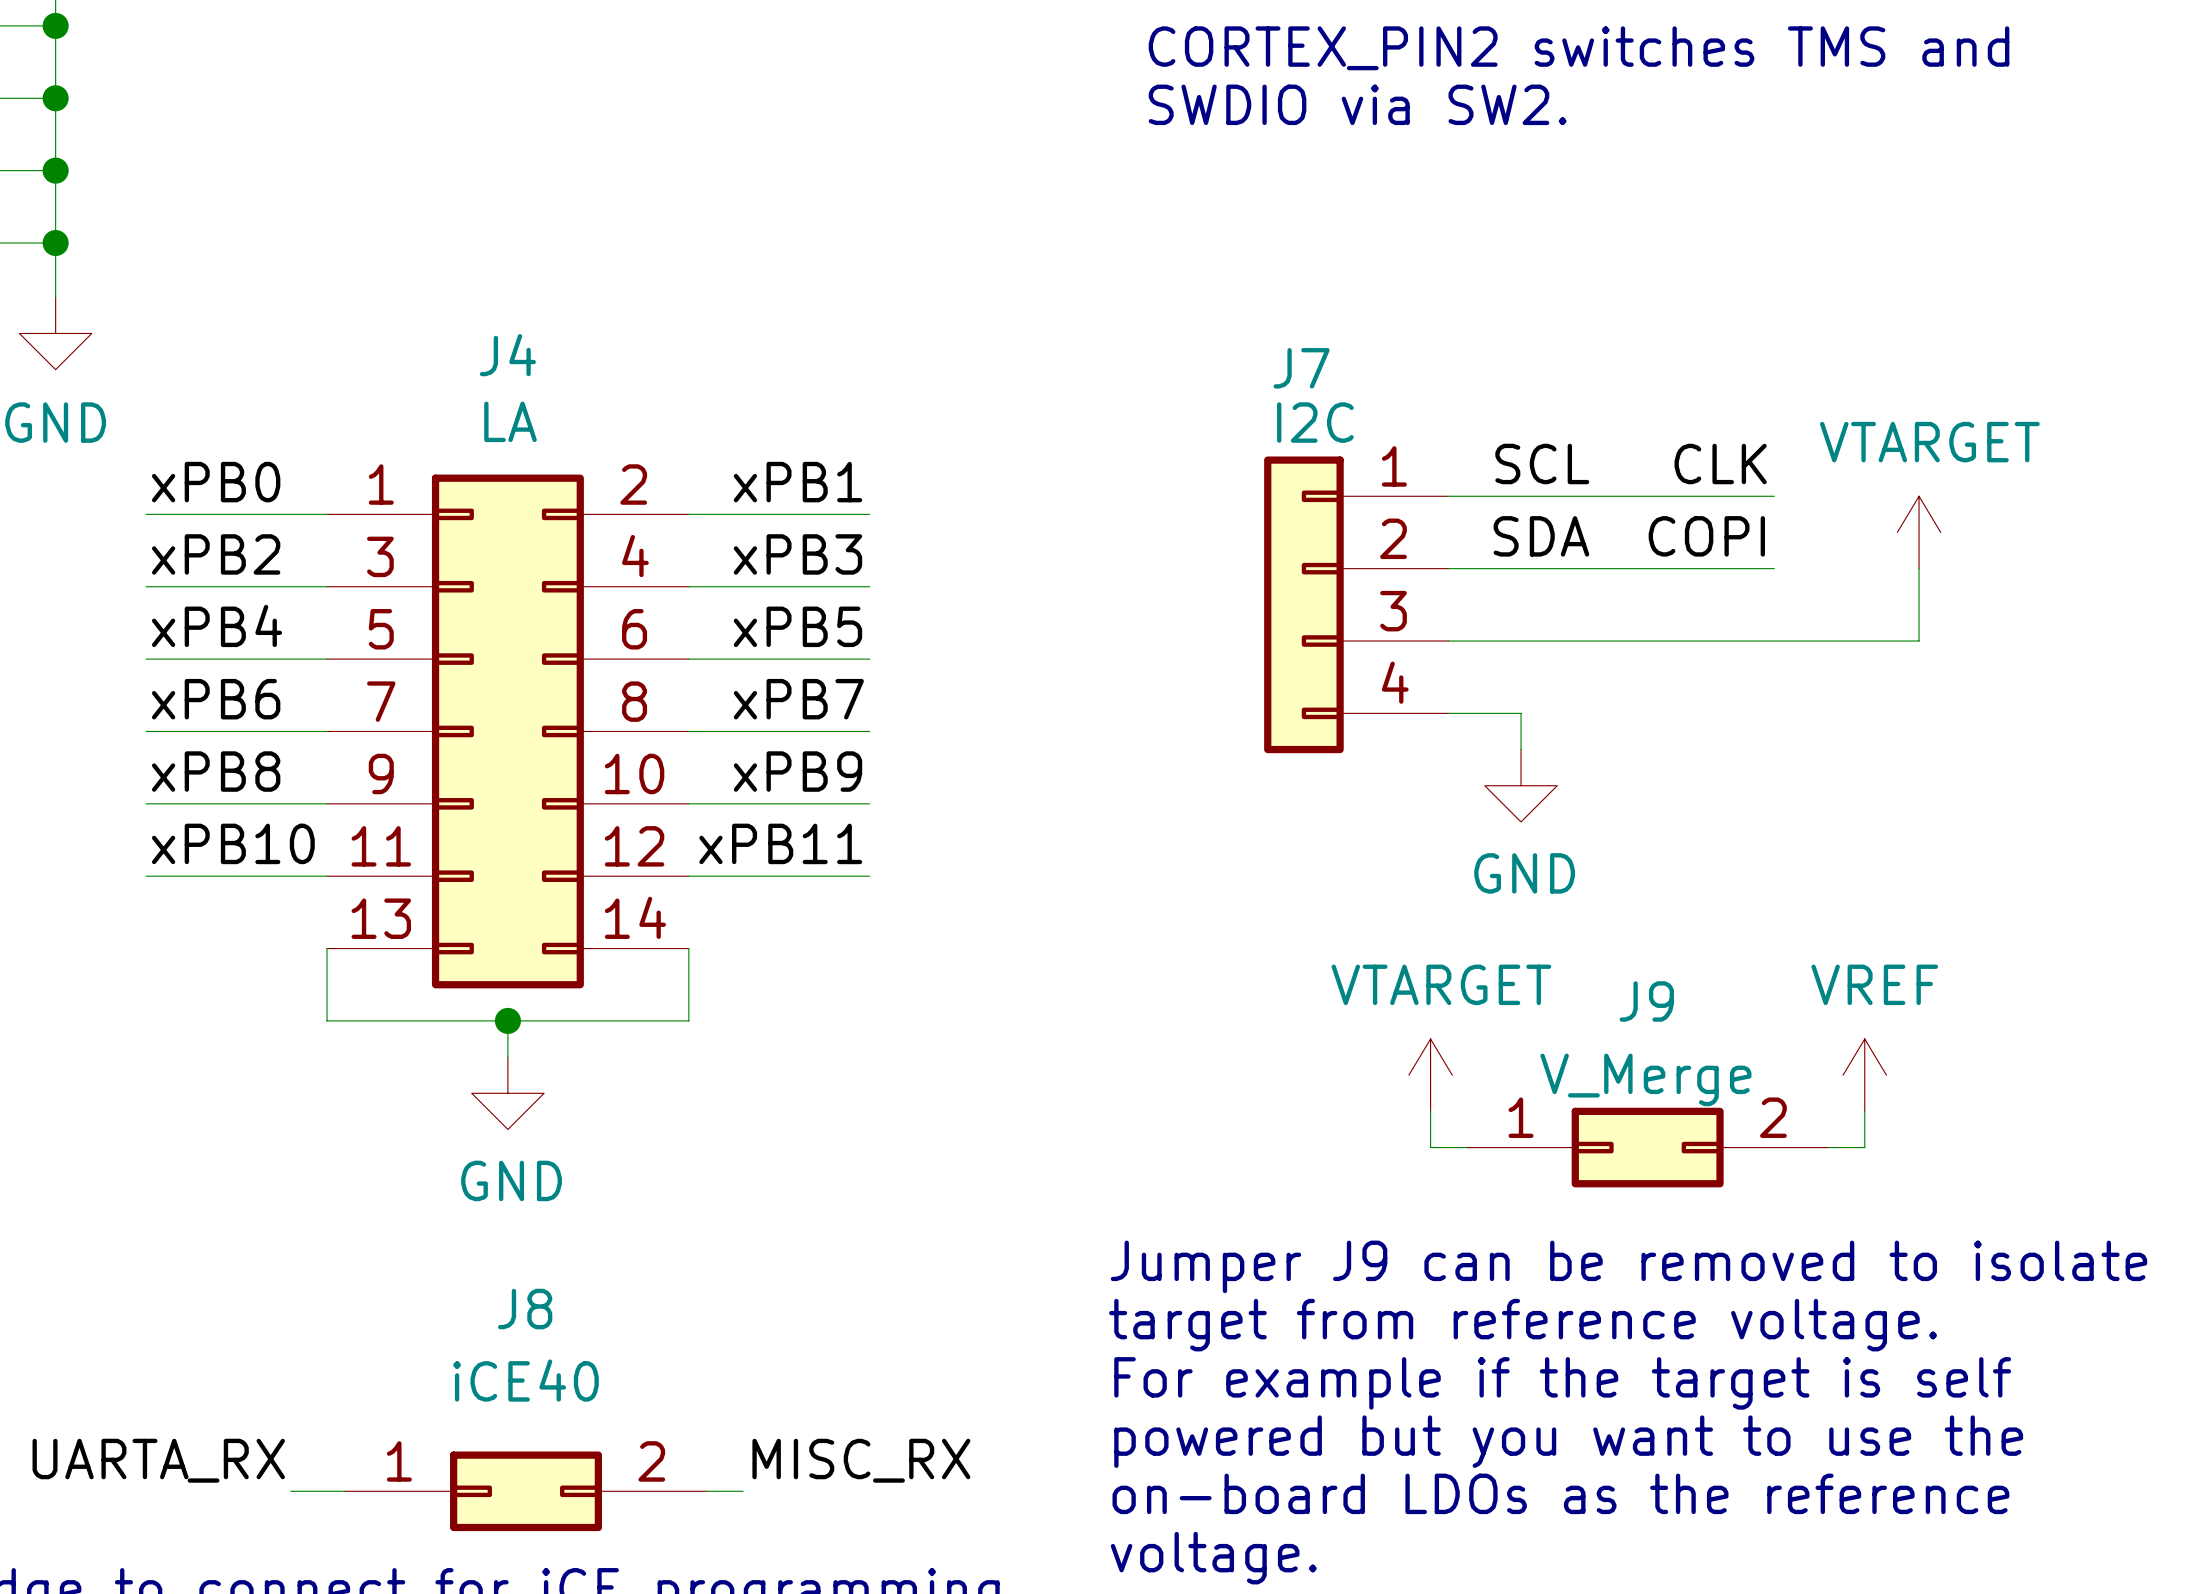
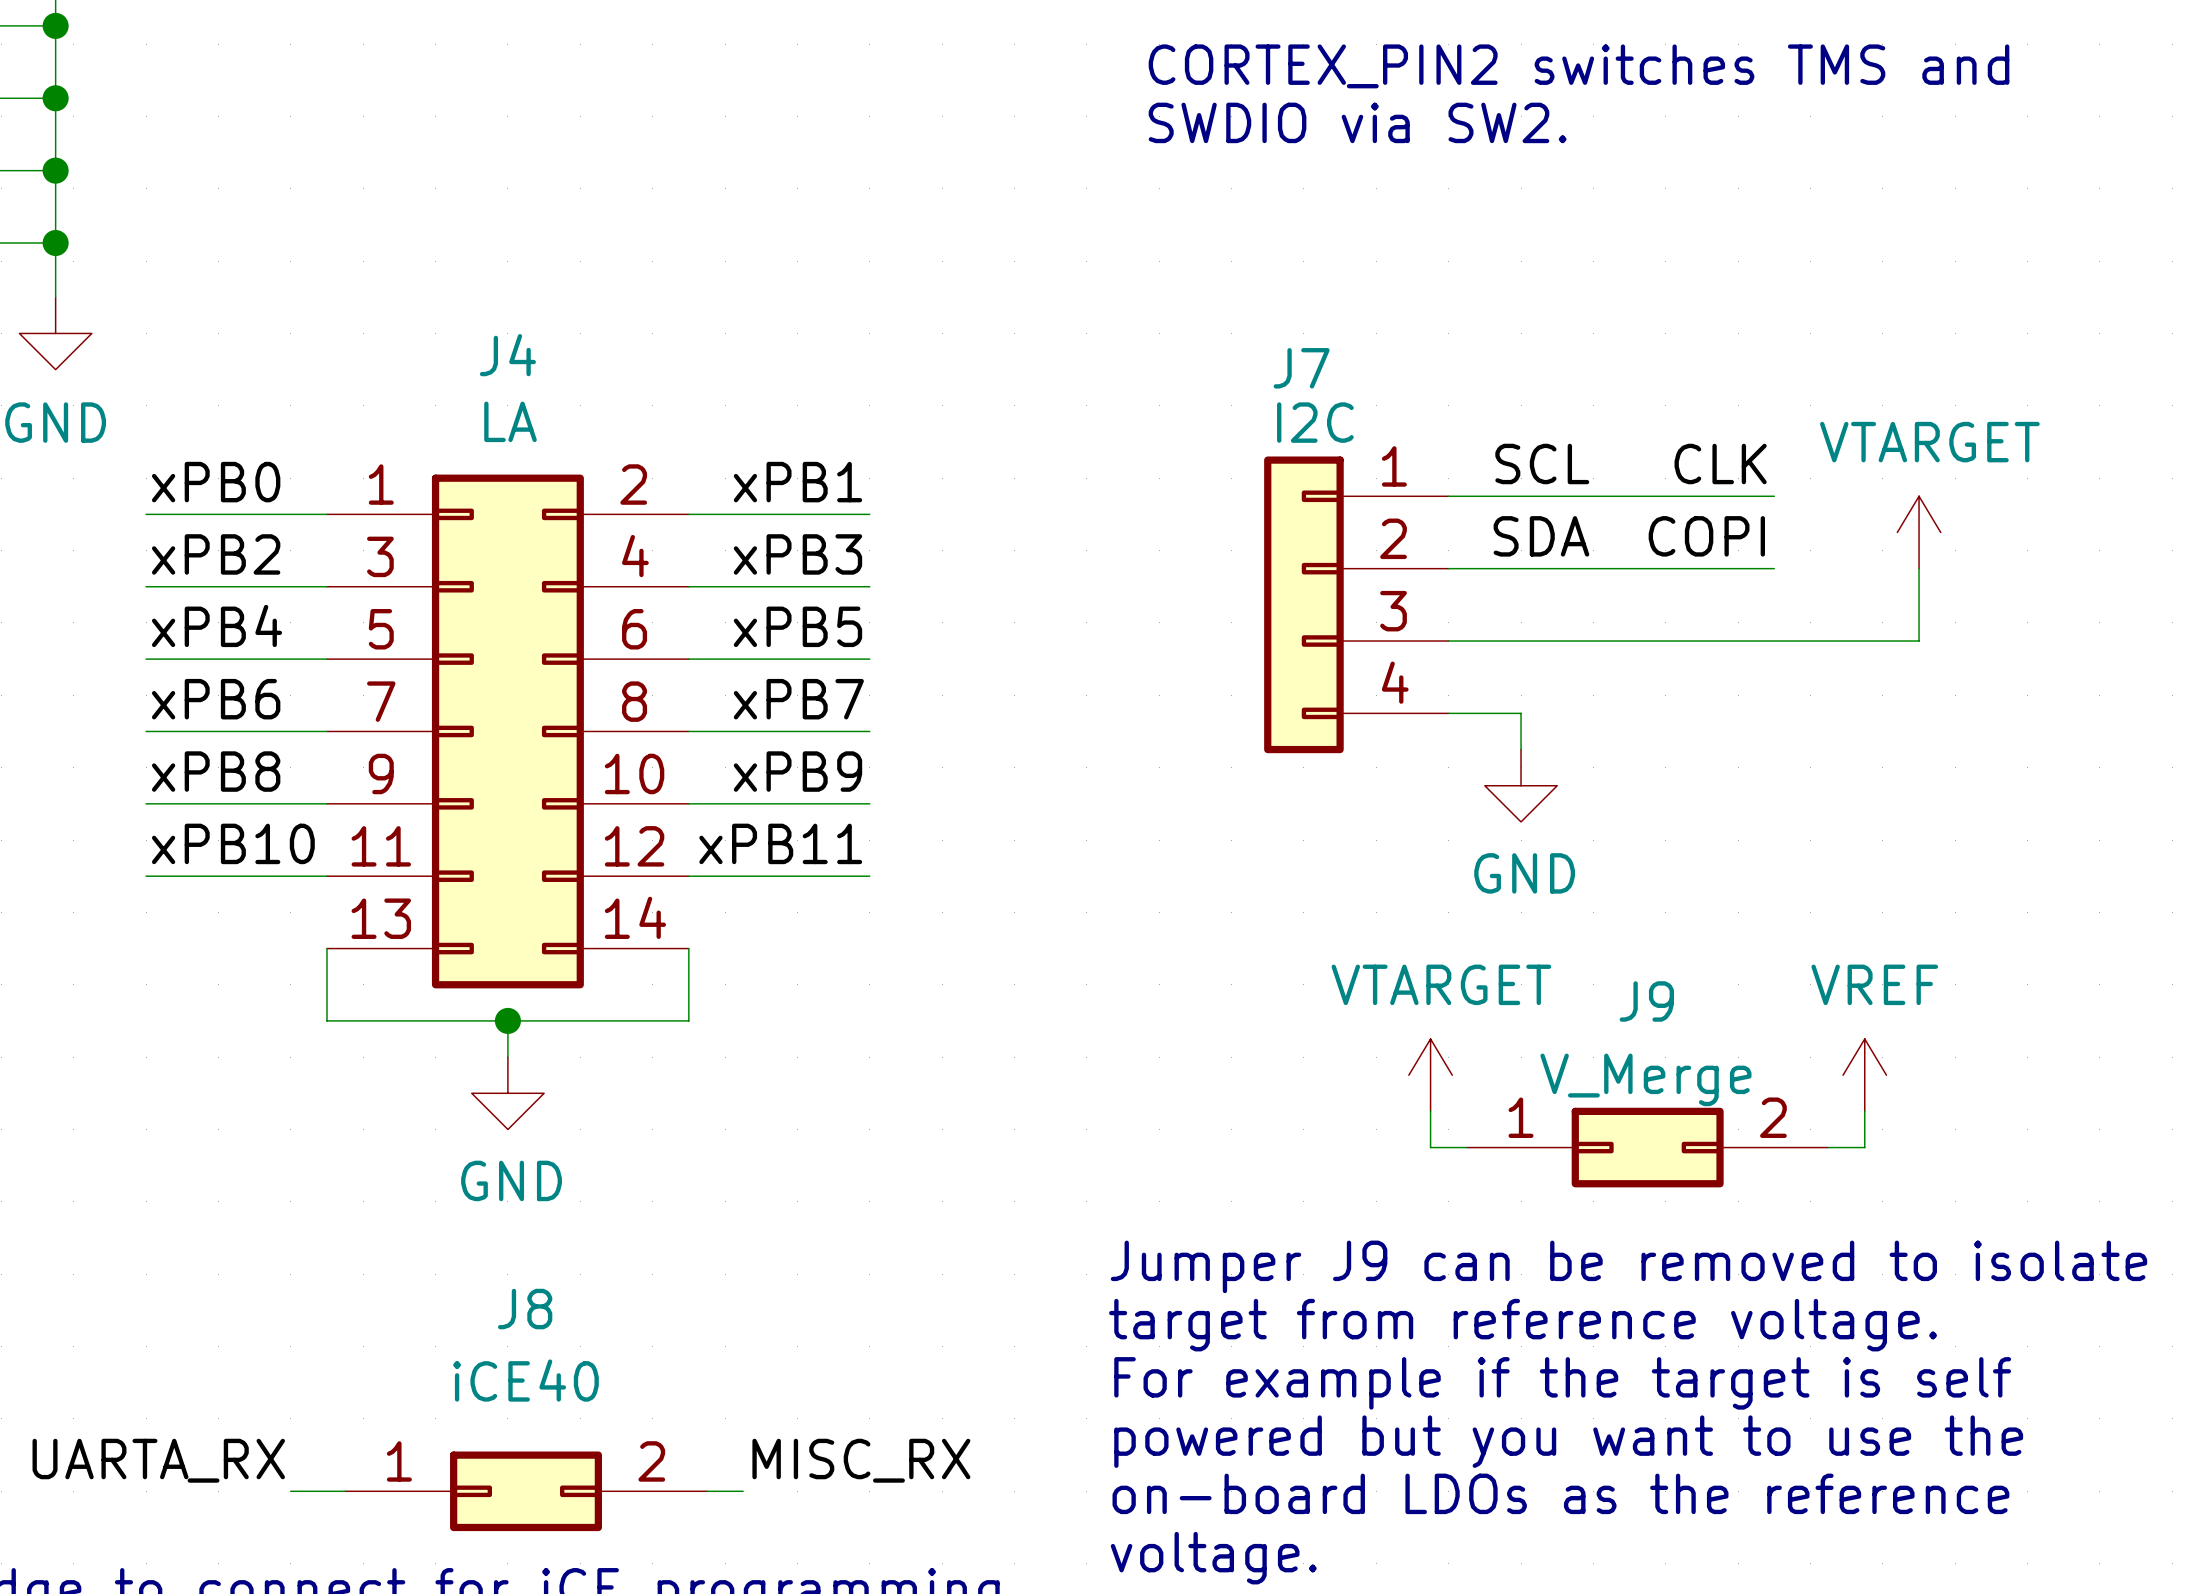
text position: CORTEX_PIN2 switches TMS and (1579, 48) -> CORTEX_PIN2 switches TMS and (1579, 66)
text position: SWDIO via SW2. (1357, 104) -> SWDIO via SW2. (1357, 122)

